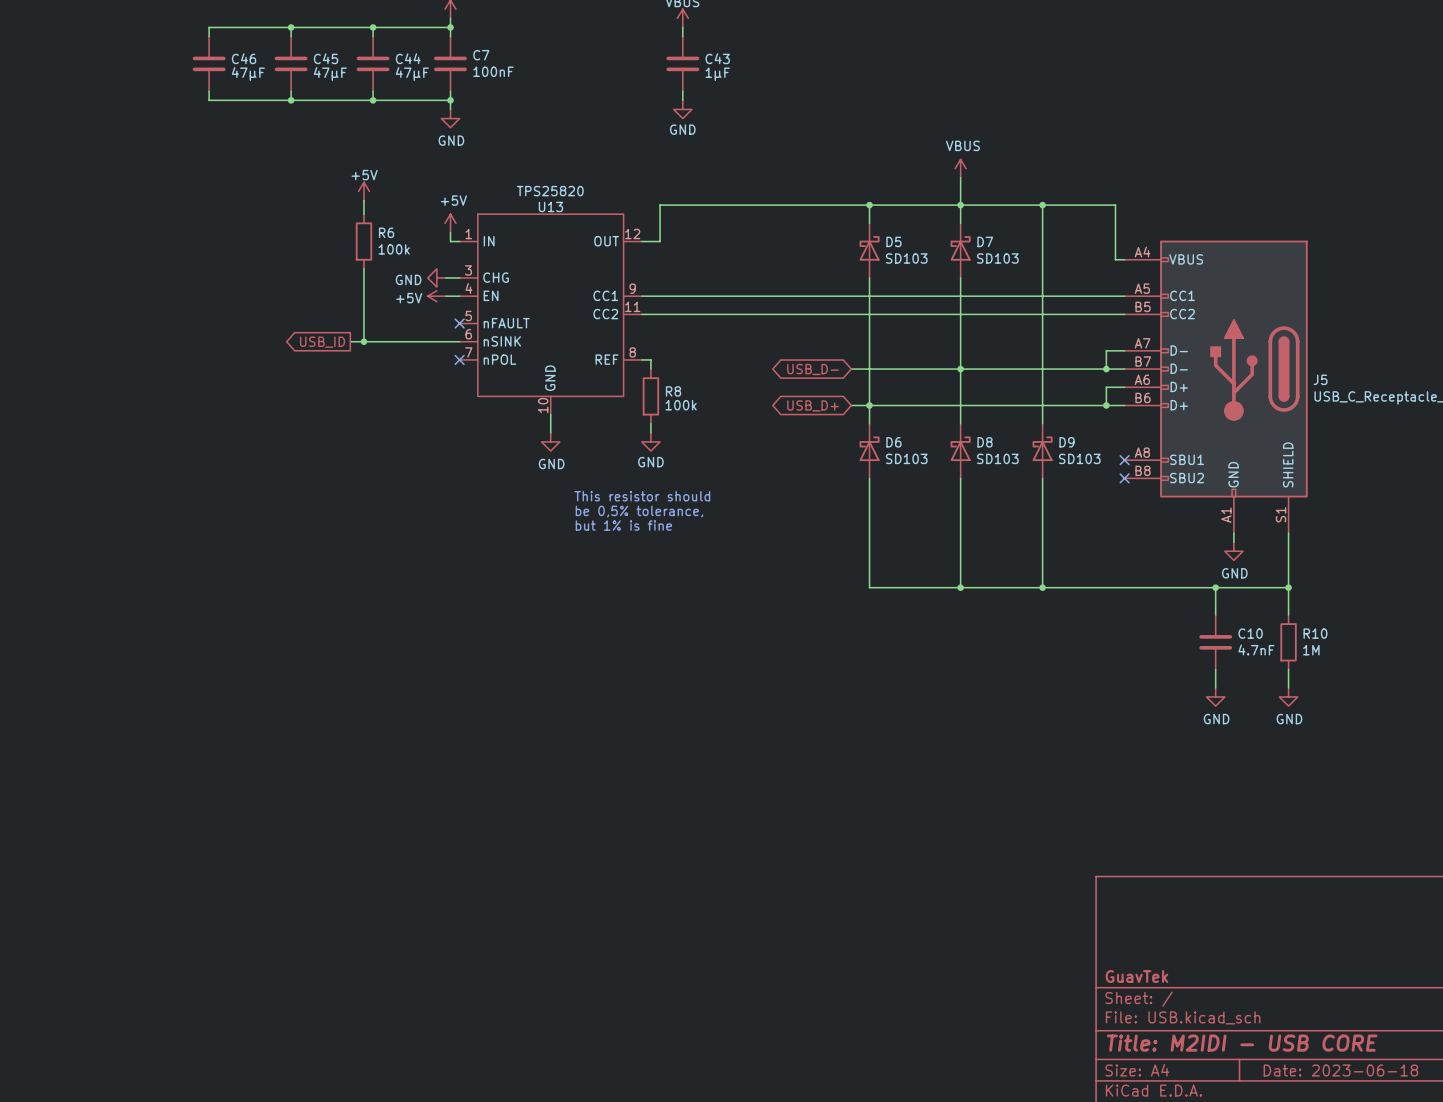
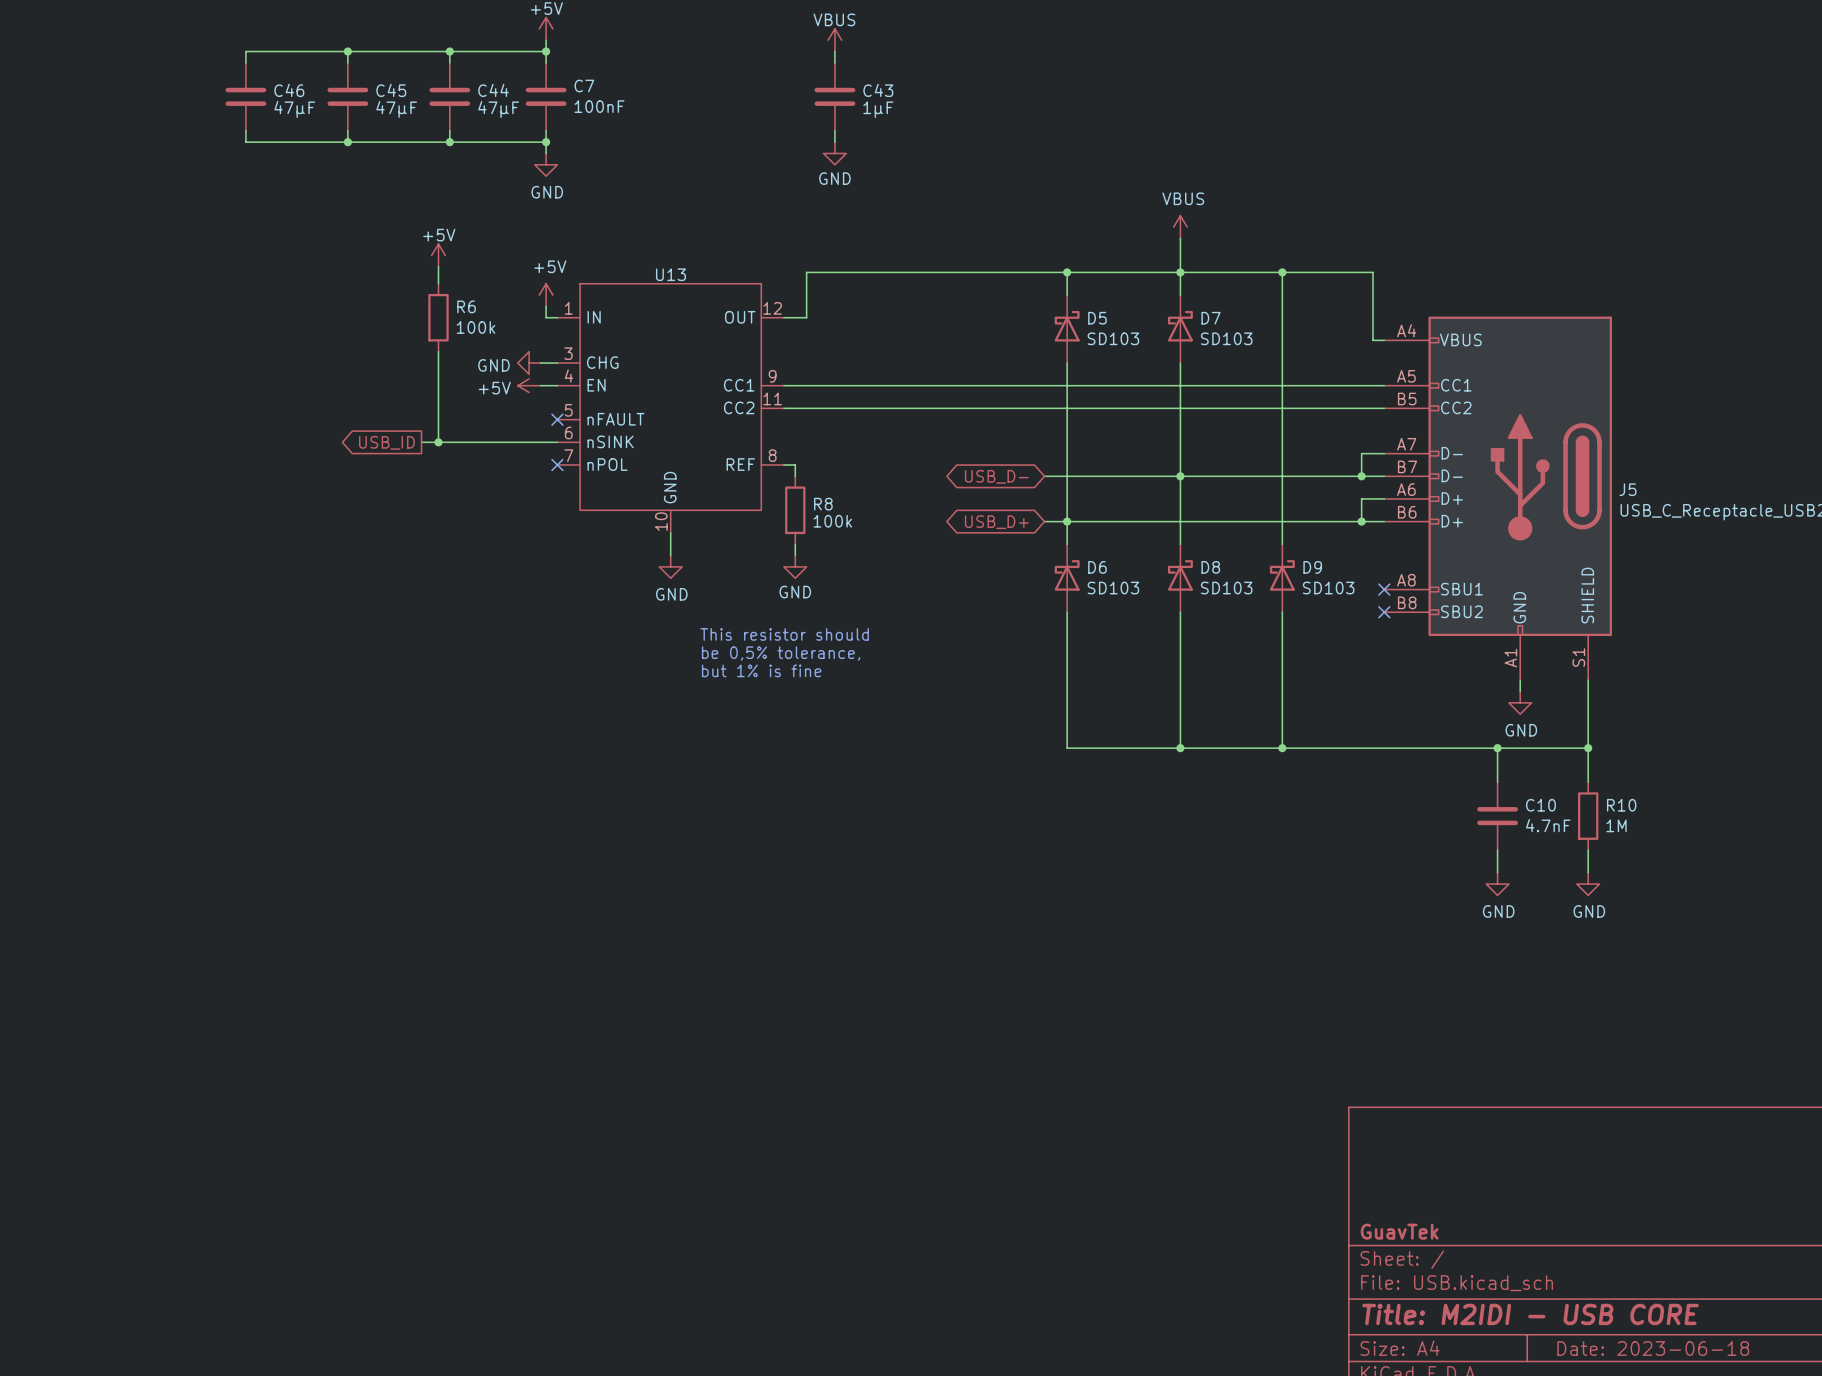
U13 value: TPS25820 (550, 191) -> none

